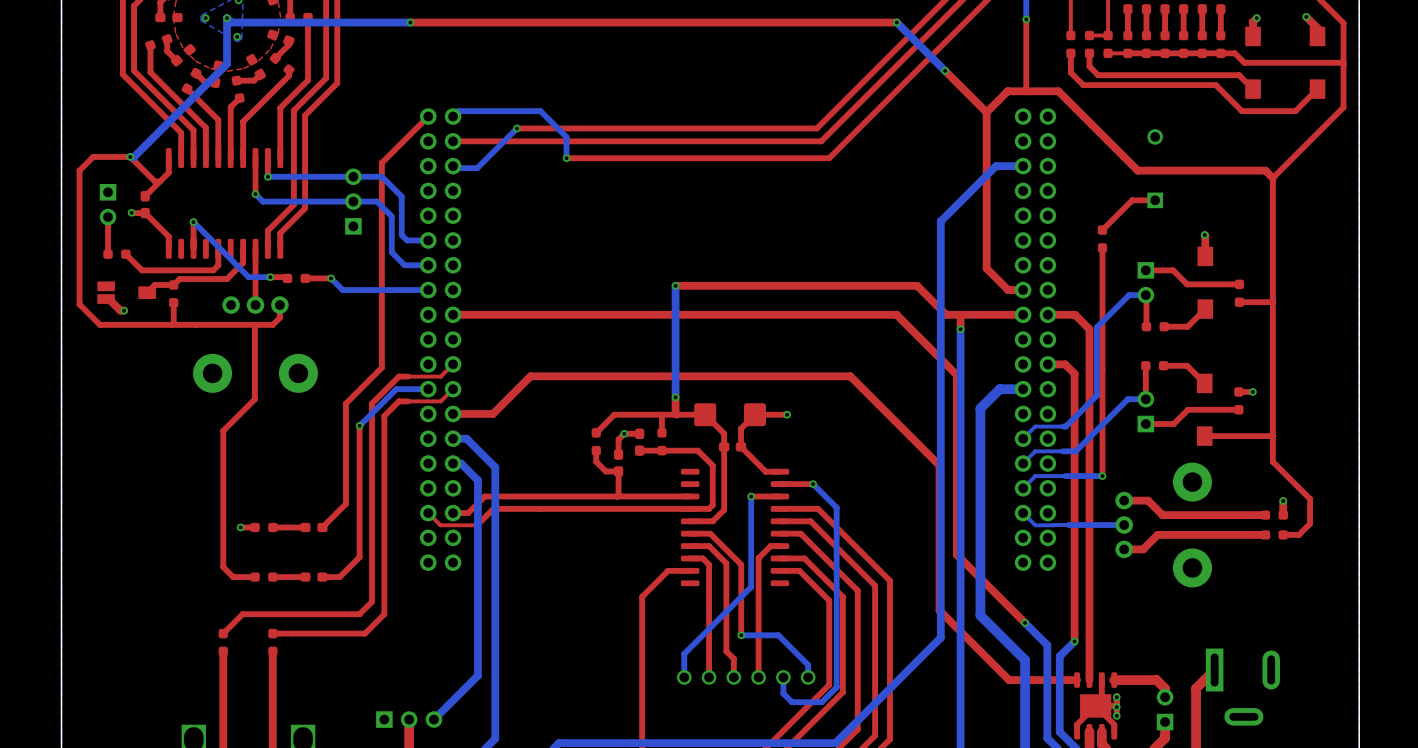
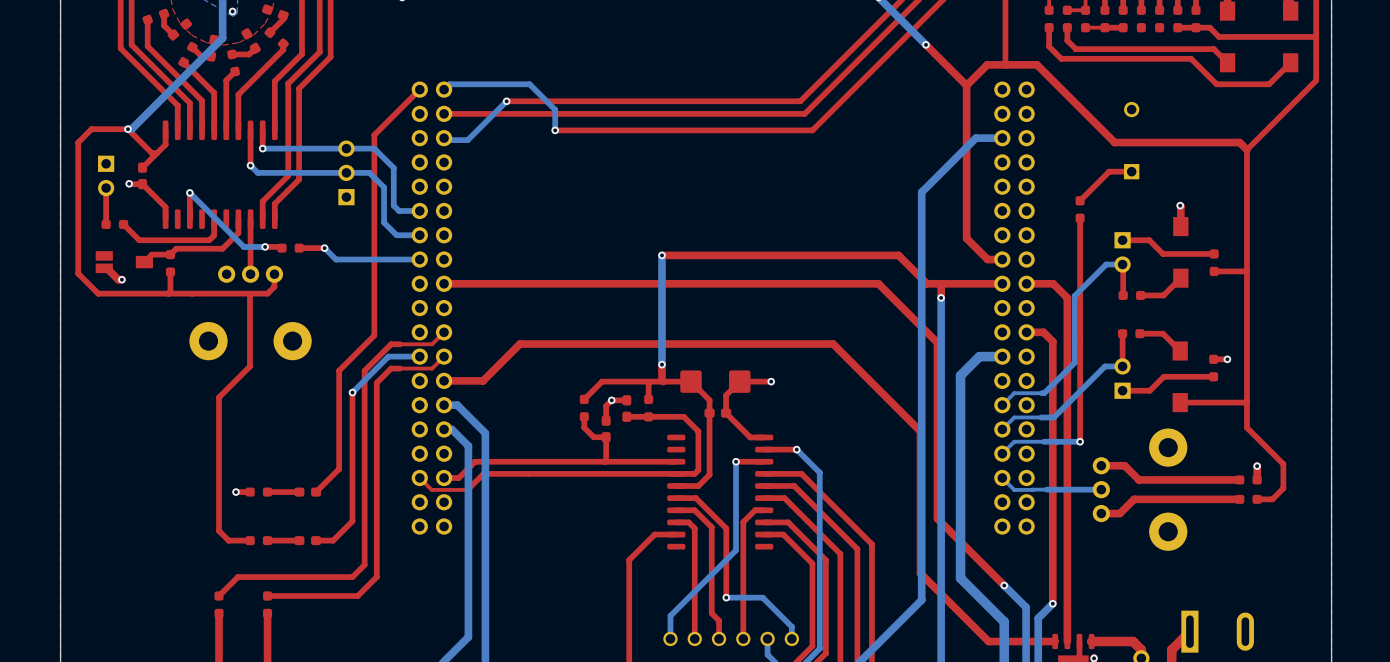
top track: (1202, 53) (1146, 53) -> none

